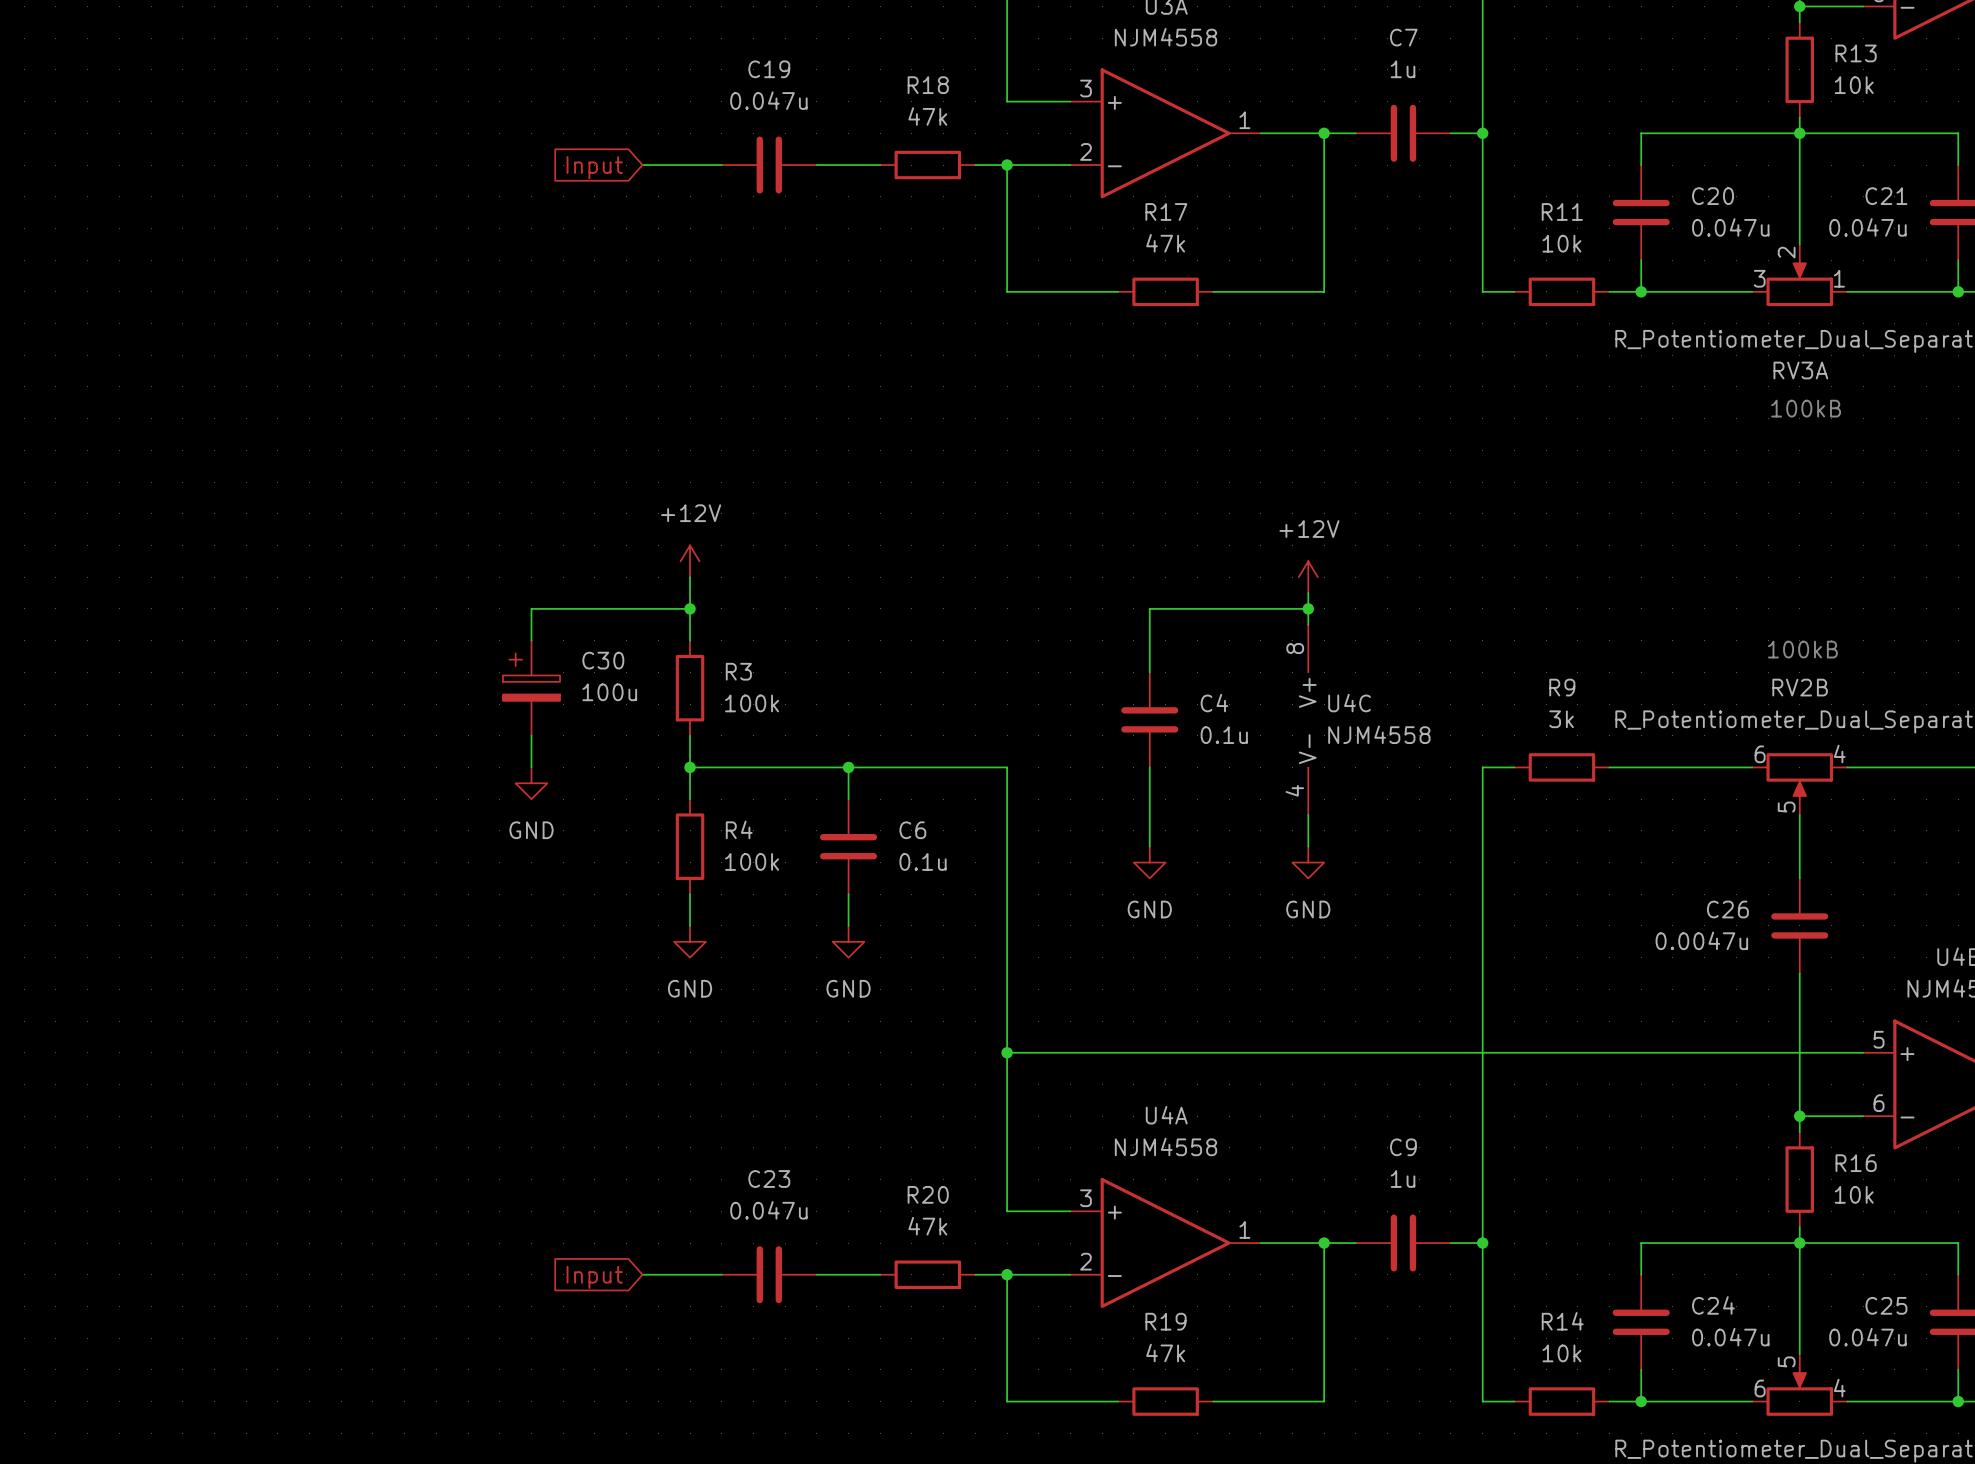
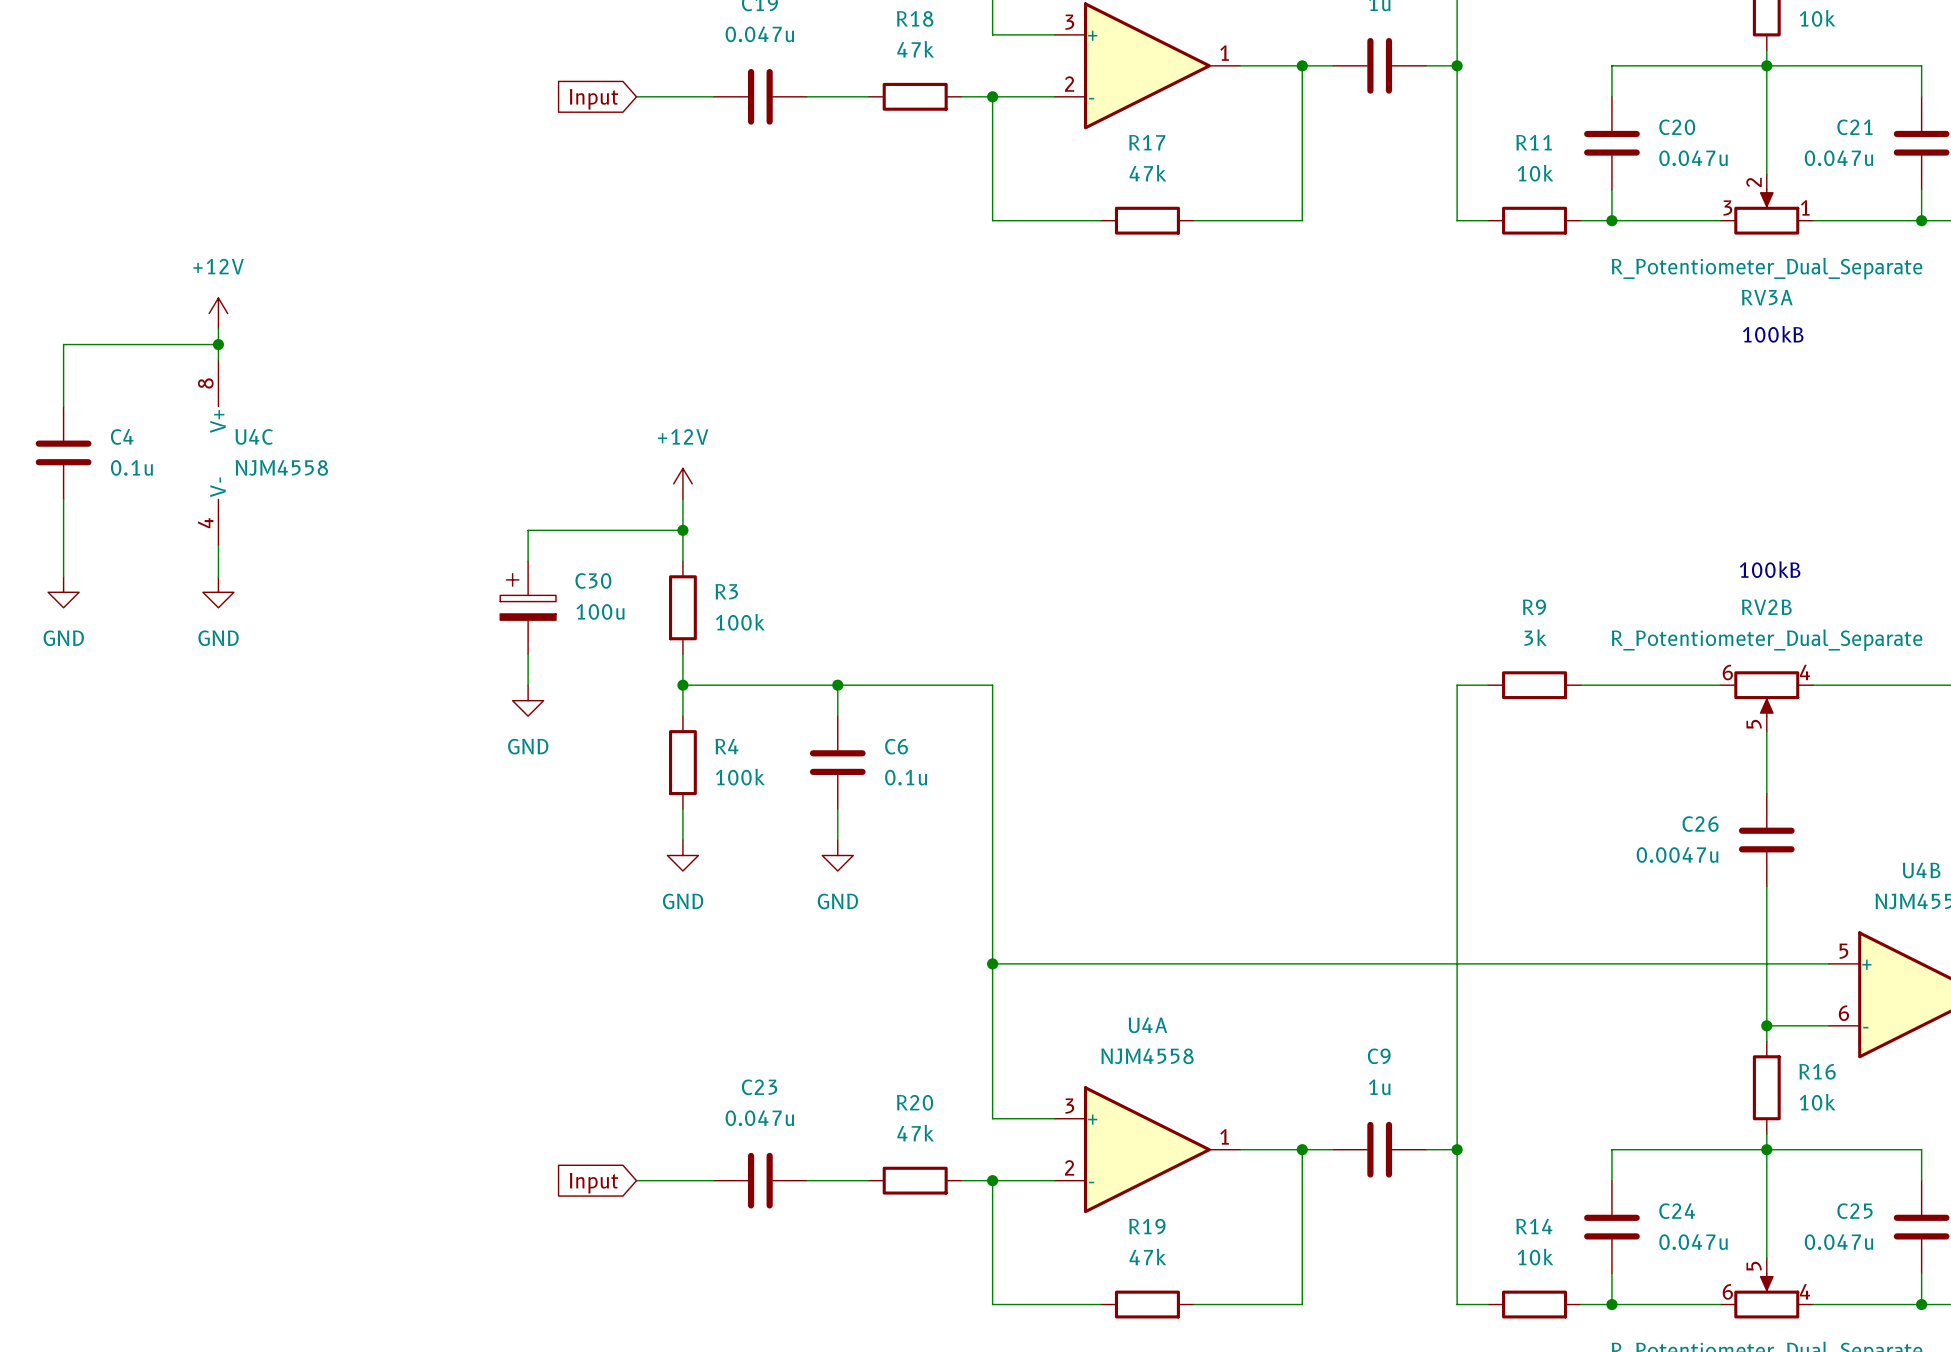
power symbol: none -> +12V (218, 313)
wire: none -> (218, 329) (218, 360)
wire: none -> (218, 344) (63, 344) (63, 406)
junction: none -> (218, 344)
wire: none -> (63, 499) (63, 576)
power symbol: +12V (1308, 577) -> none
wire: (1308, 593) (1308, 624) -> none
wire: (1308, 608) (1149, 608) (1149, 672) -> none
junction: (1308, 608) -> none
wire: none -> (218, 545) (218, 576)
power symbol: none -> GND (63, 592)
power symbol: none -> GND (218, 592)
C4 position: (1149, 719) -> (63, 452)
U4C position: (1308, 719) -> (218, 452)
wire: (1149, 767) (1149, 846) -> none
wire: (1308, 814) (1308, 846) -> none
power symbol: GND (1149, 862) -> none
power symbol: GND (1308, 862) -> none

